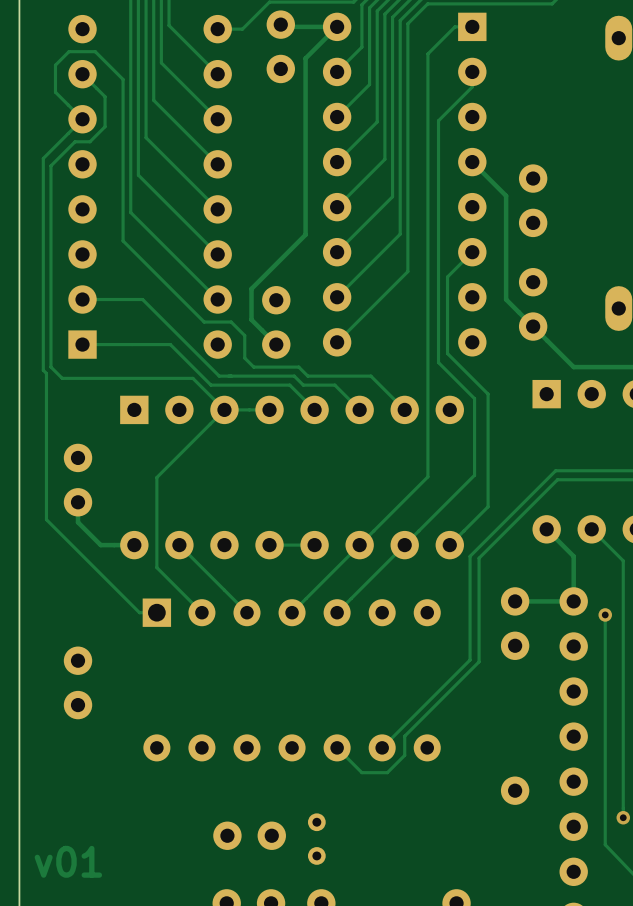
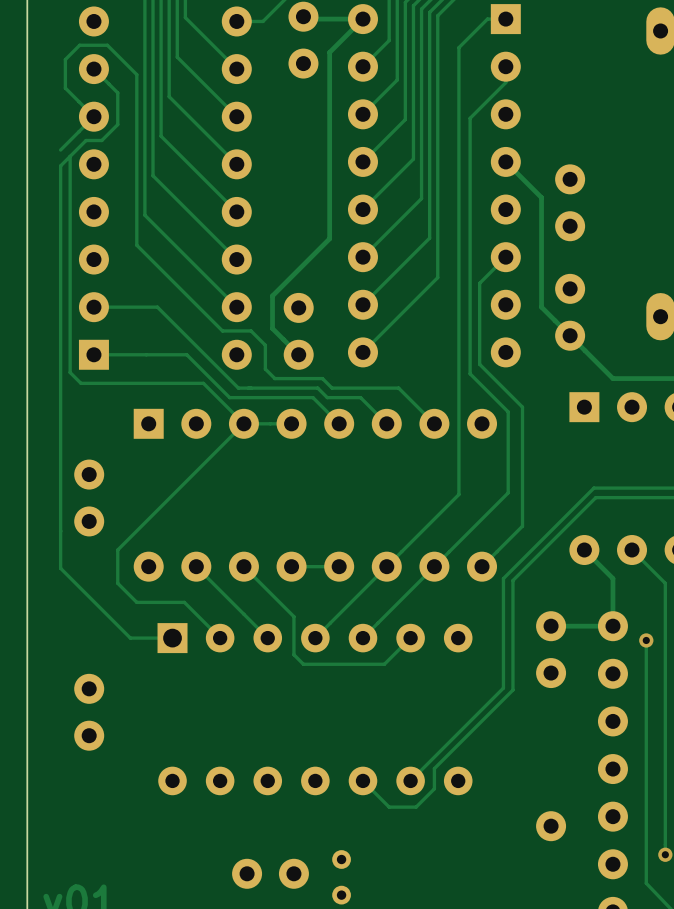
track: (50, 150) (43, 158) (43, 370) (46, 373) (46, 519) (139, 612) -> (60, 378) (60, 568) (130, 638) (154, 638)
track: (50, 367) (62, 378) (192, 378) -> (70, 156) (70, 372) (80, 383) (203, 383) (210, 390)
track: (156, 477) (156, 567) (168, 578) -> (172, 495) (117, 550) (117, 583) (136, 602) (184, 602)
track: (78, 502) (78, 522) (100, 545) (134, 545) -> none
track: none -> (243, 566) (293, 616) (293, 654) (303, 664) (384, 664) (410, 638)

